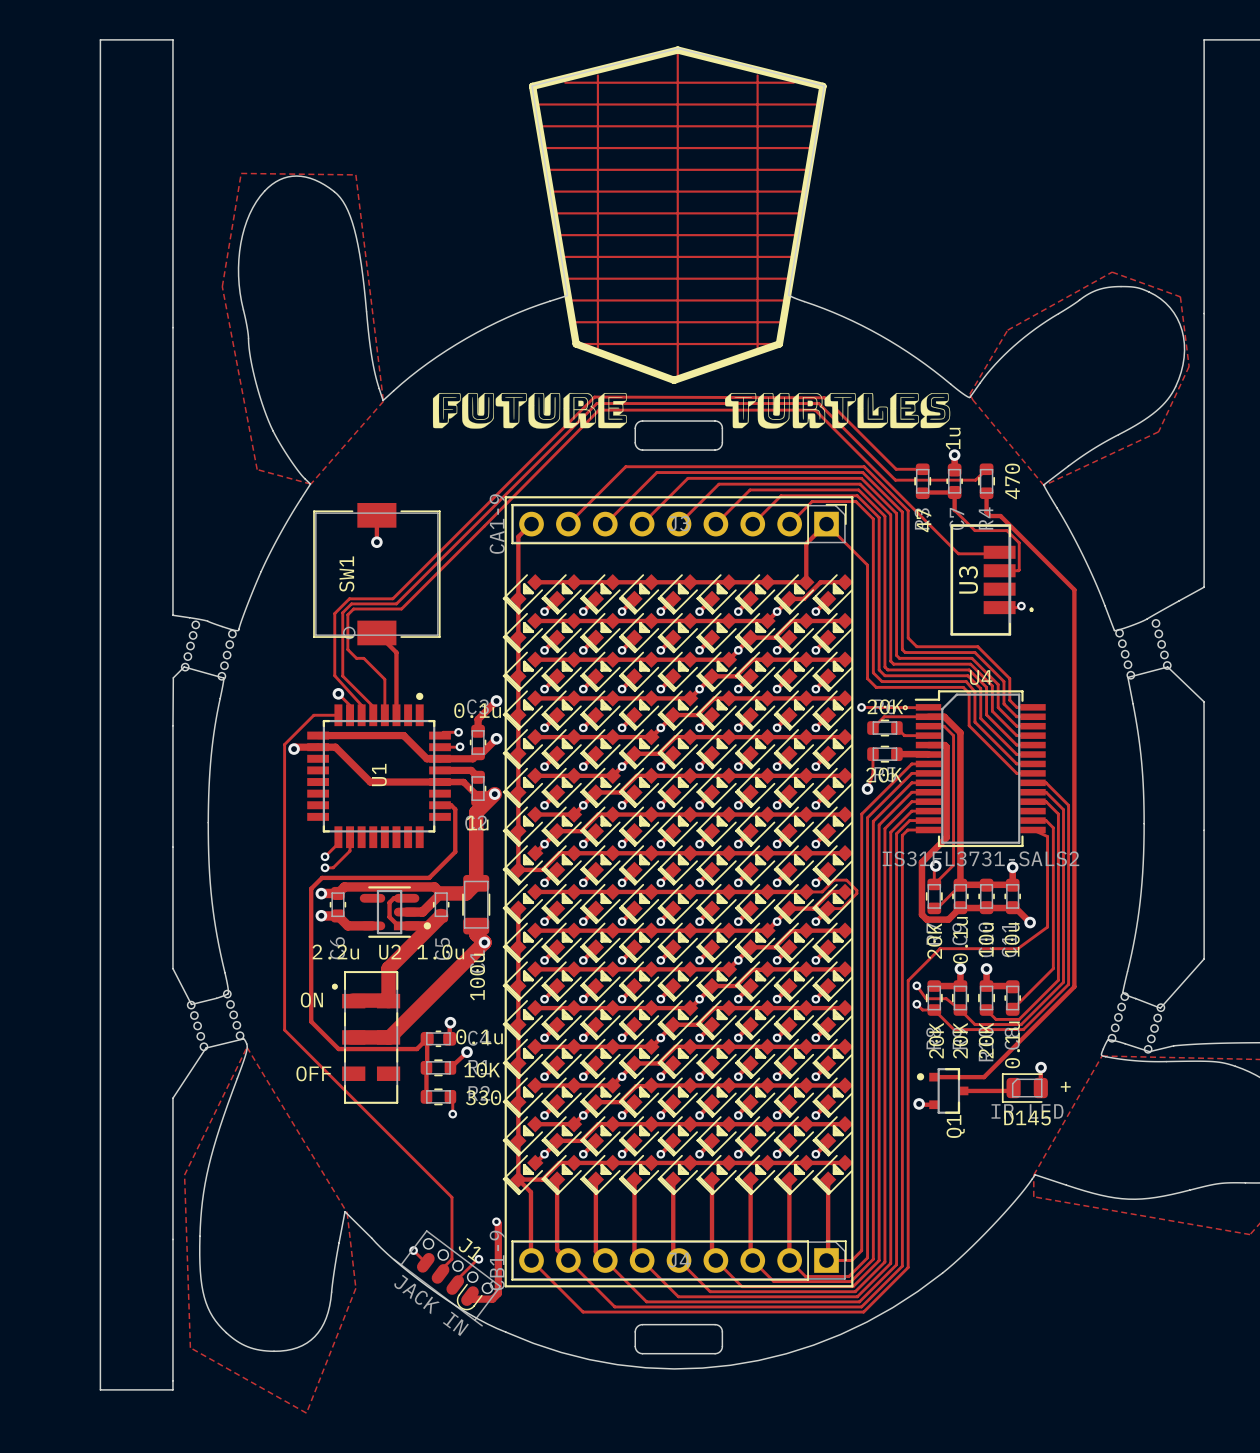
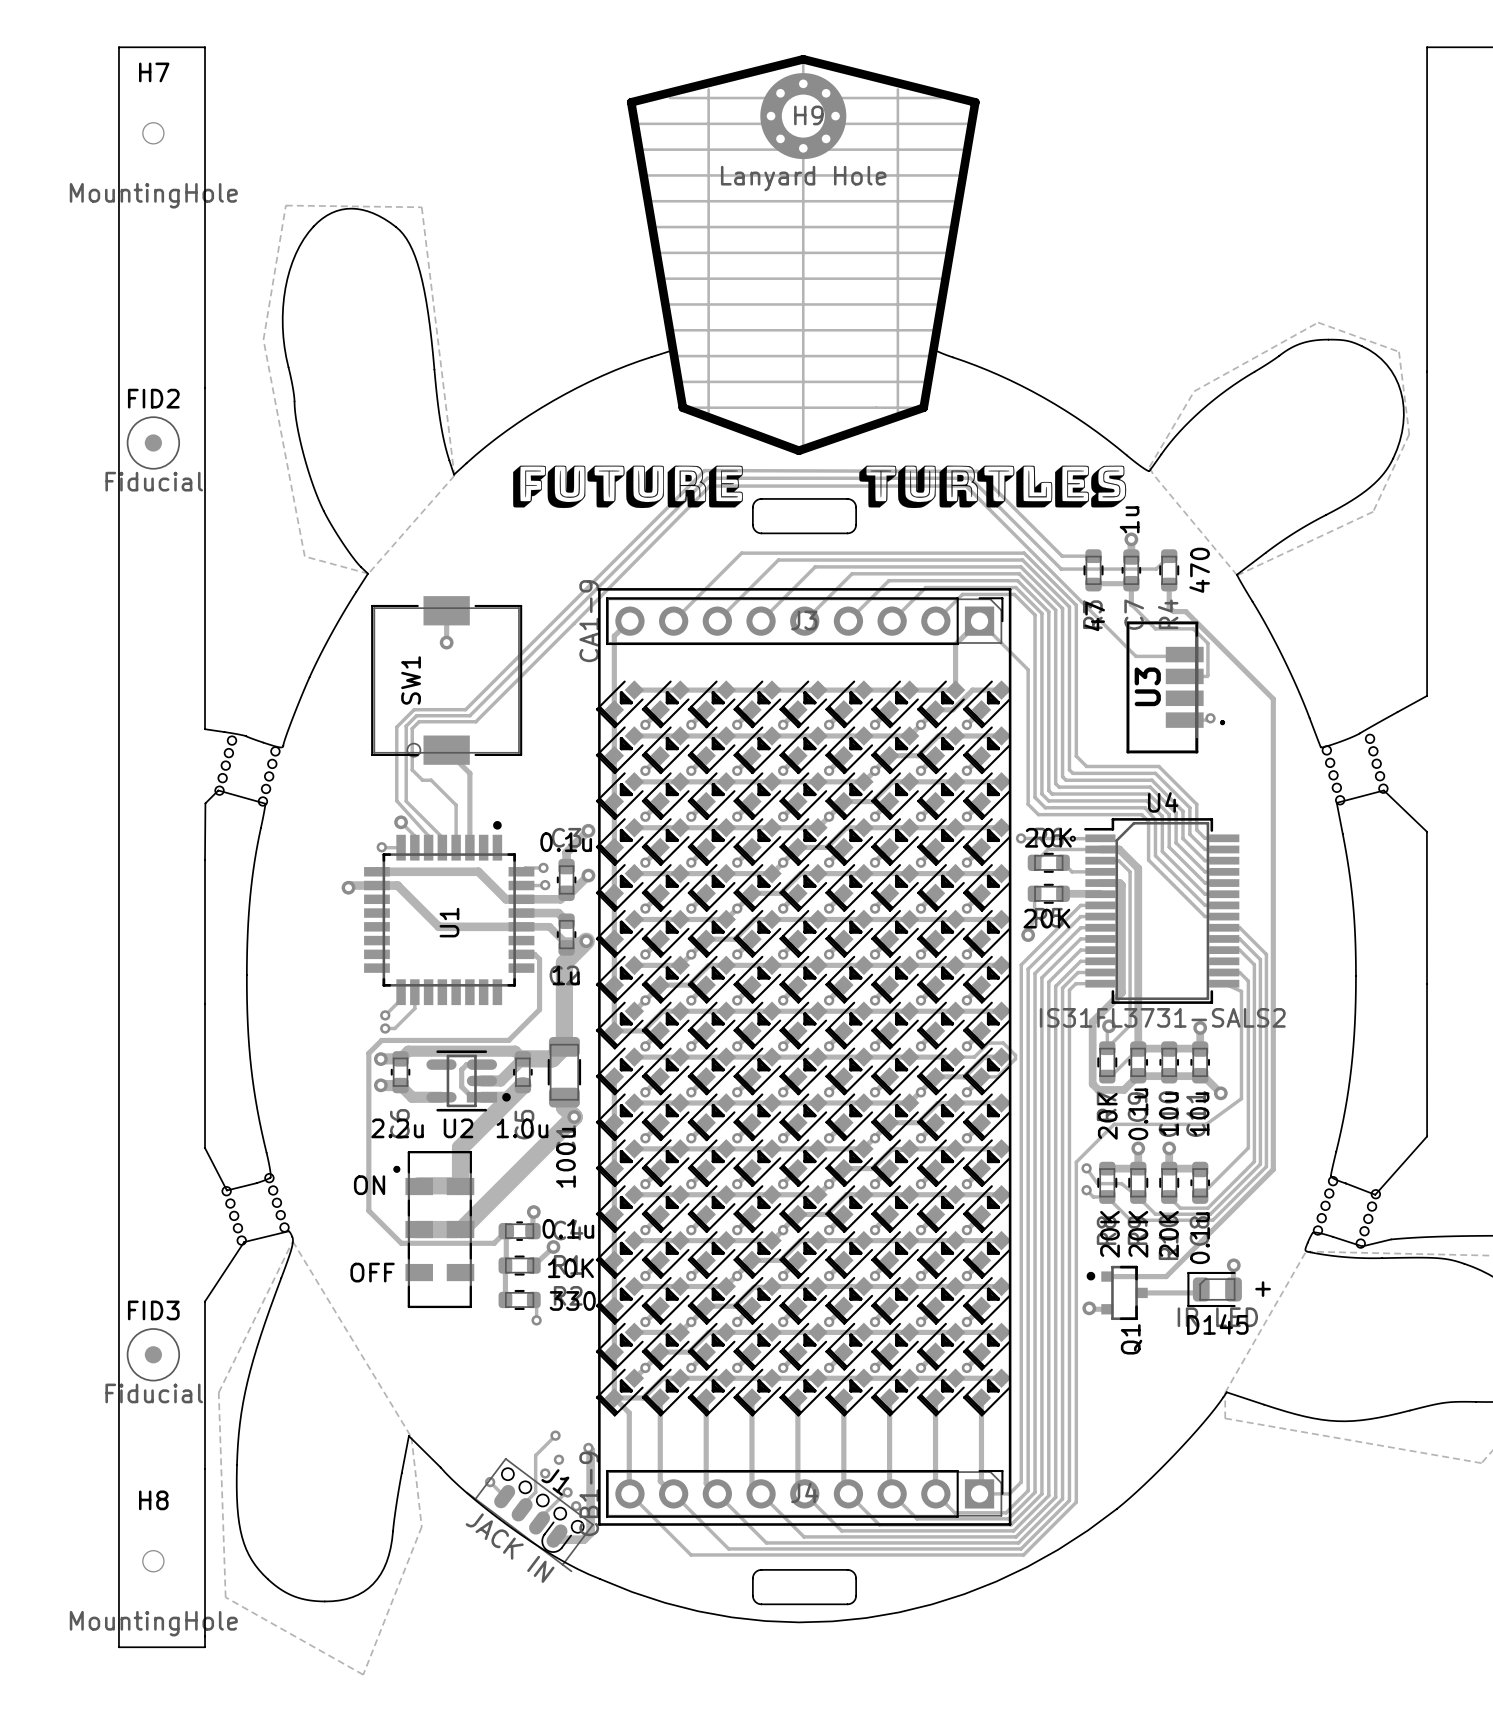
H9: none -> Lanyard Hole (803, 116)
H7: none -> MountingHole (153, 133)
FID2: none -> Fiducial (153, 442)
via: none -> (381, 847)
track: (322, 715) (313, 715) (284, 744) (284, 1030) (451, 1197) (451, 1228) -> (555, 1435) (535, 1455)
FID3: none -> Fiducial (153, 1354)
via: none -> (555, 1435)
via: none -> (558, 1459)
via: none -> (545, 1473)
via: none -> (576, 1506)
H8: none -> MountingHole (153, 1561)

